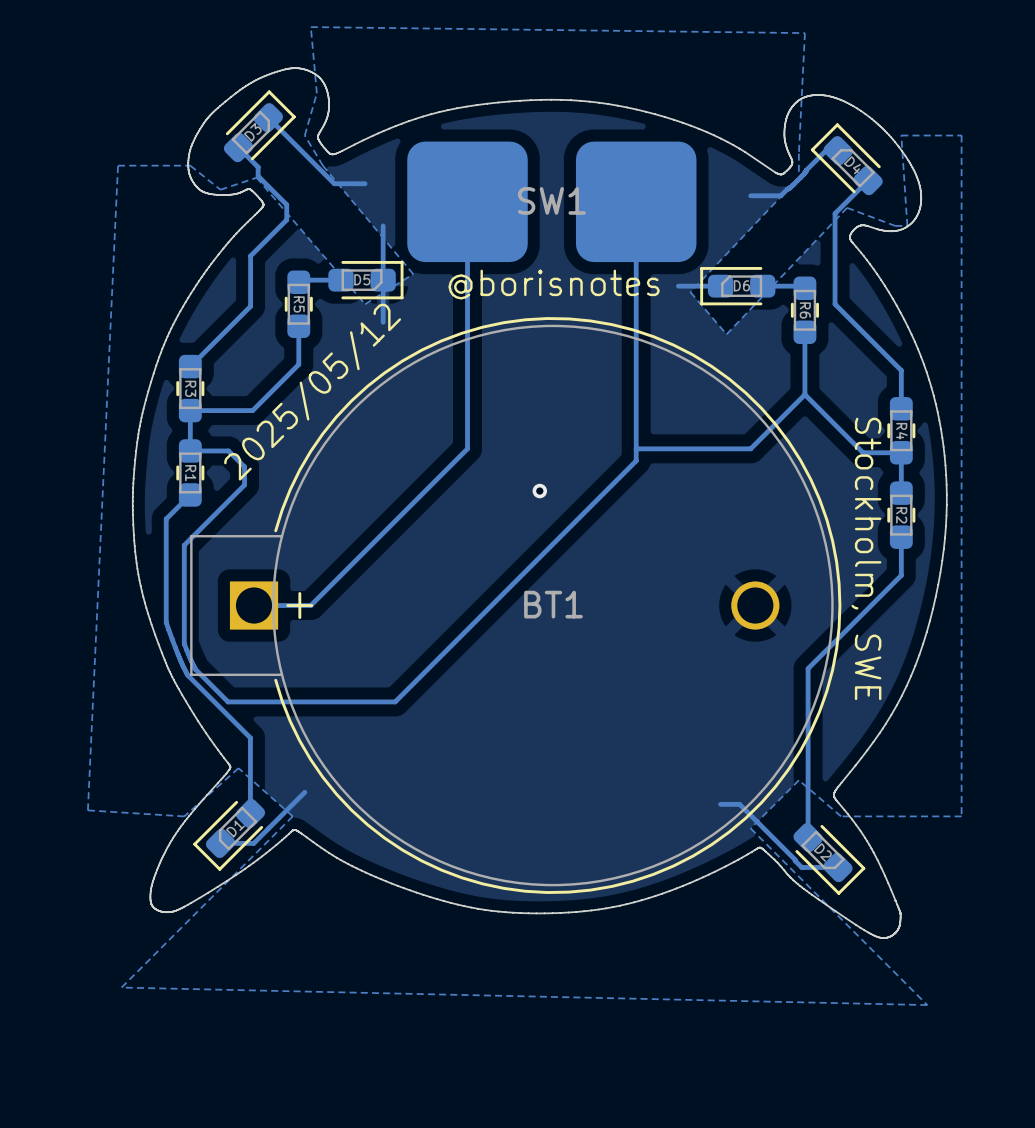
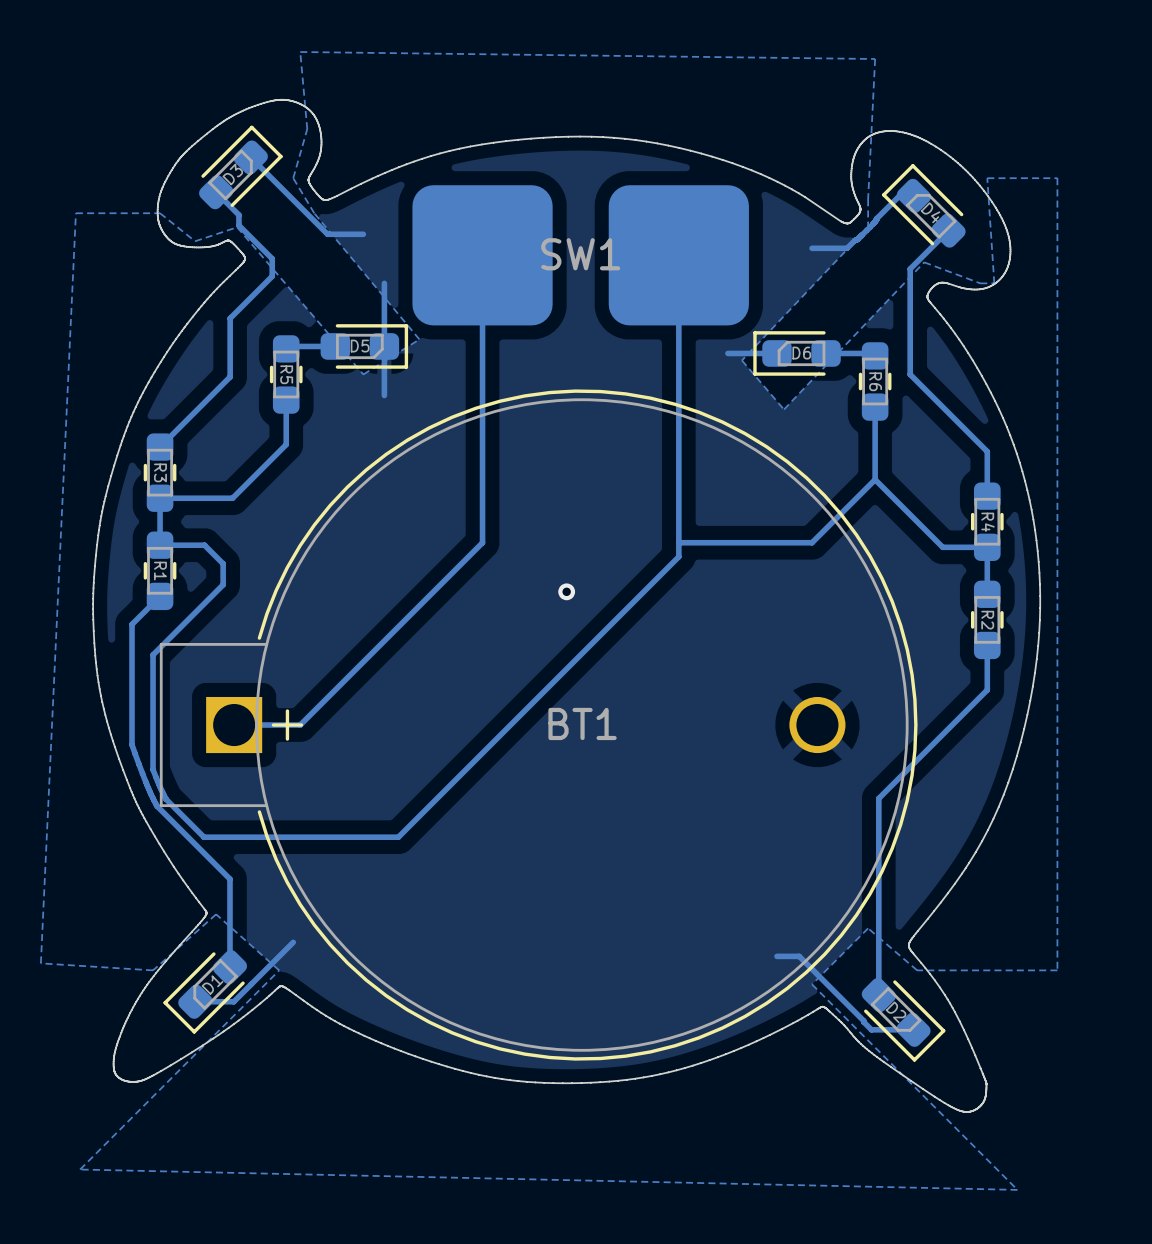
text: @borisnotes (554, 284) -> none
text: 2025/05/12 (312, 392) -> none
text: Stockholm, SWE (866, 558) -> none

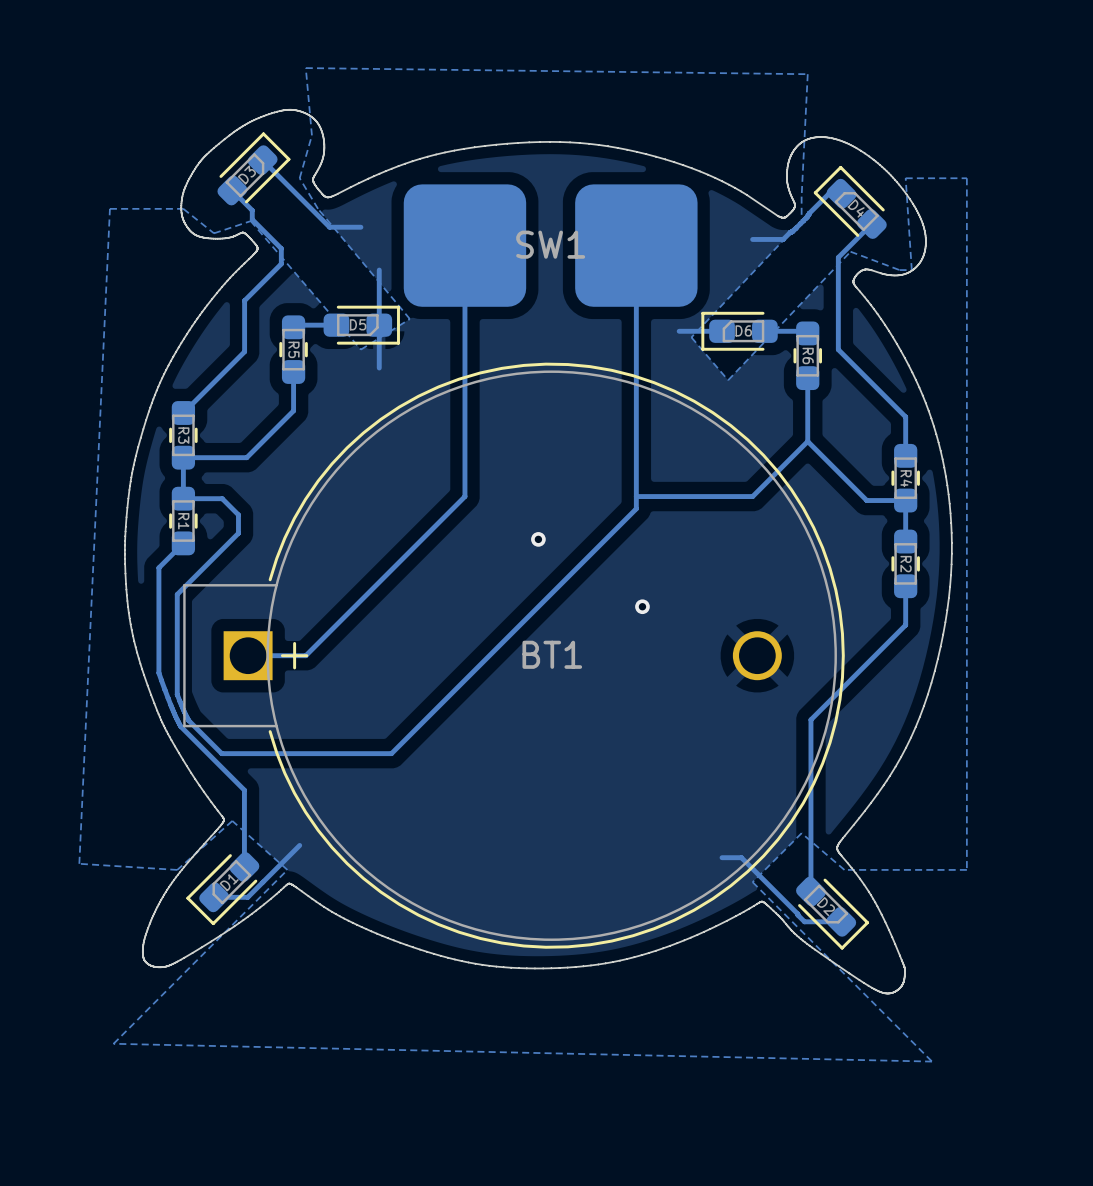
via: none -> (642, 606)

